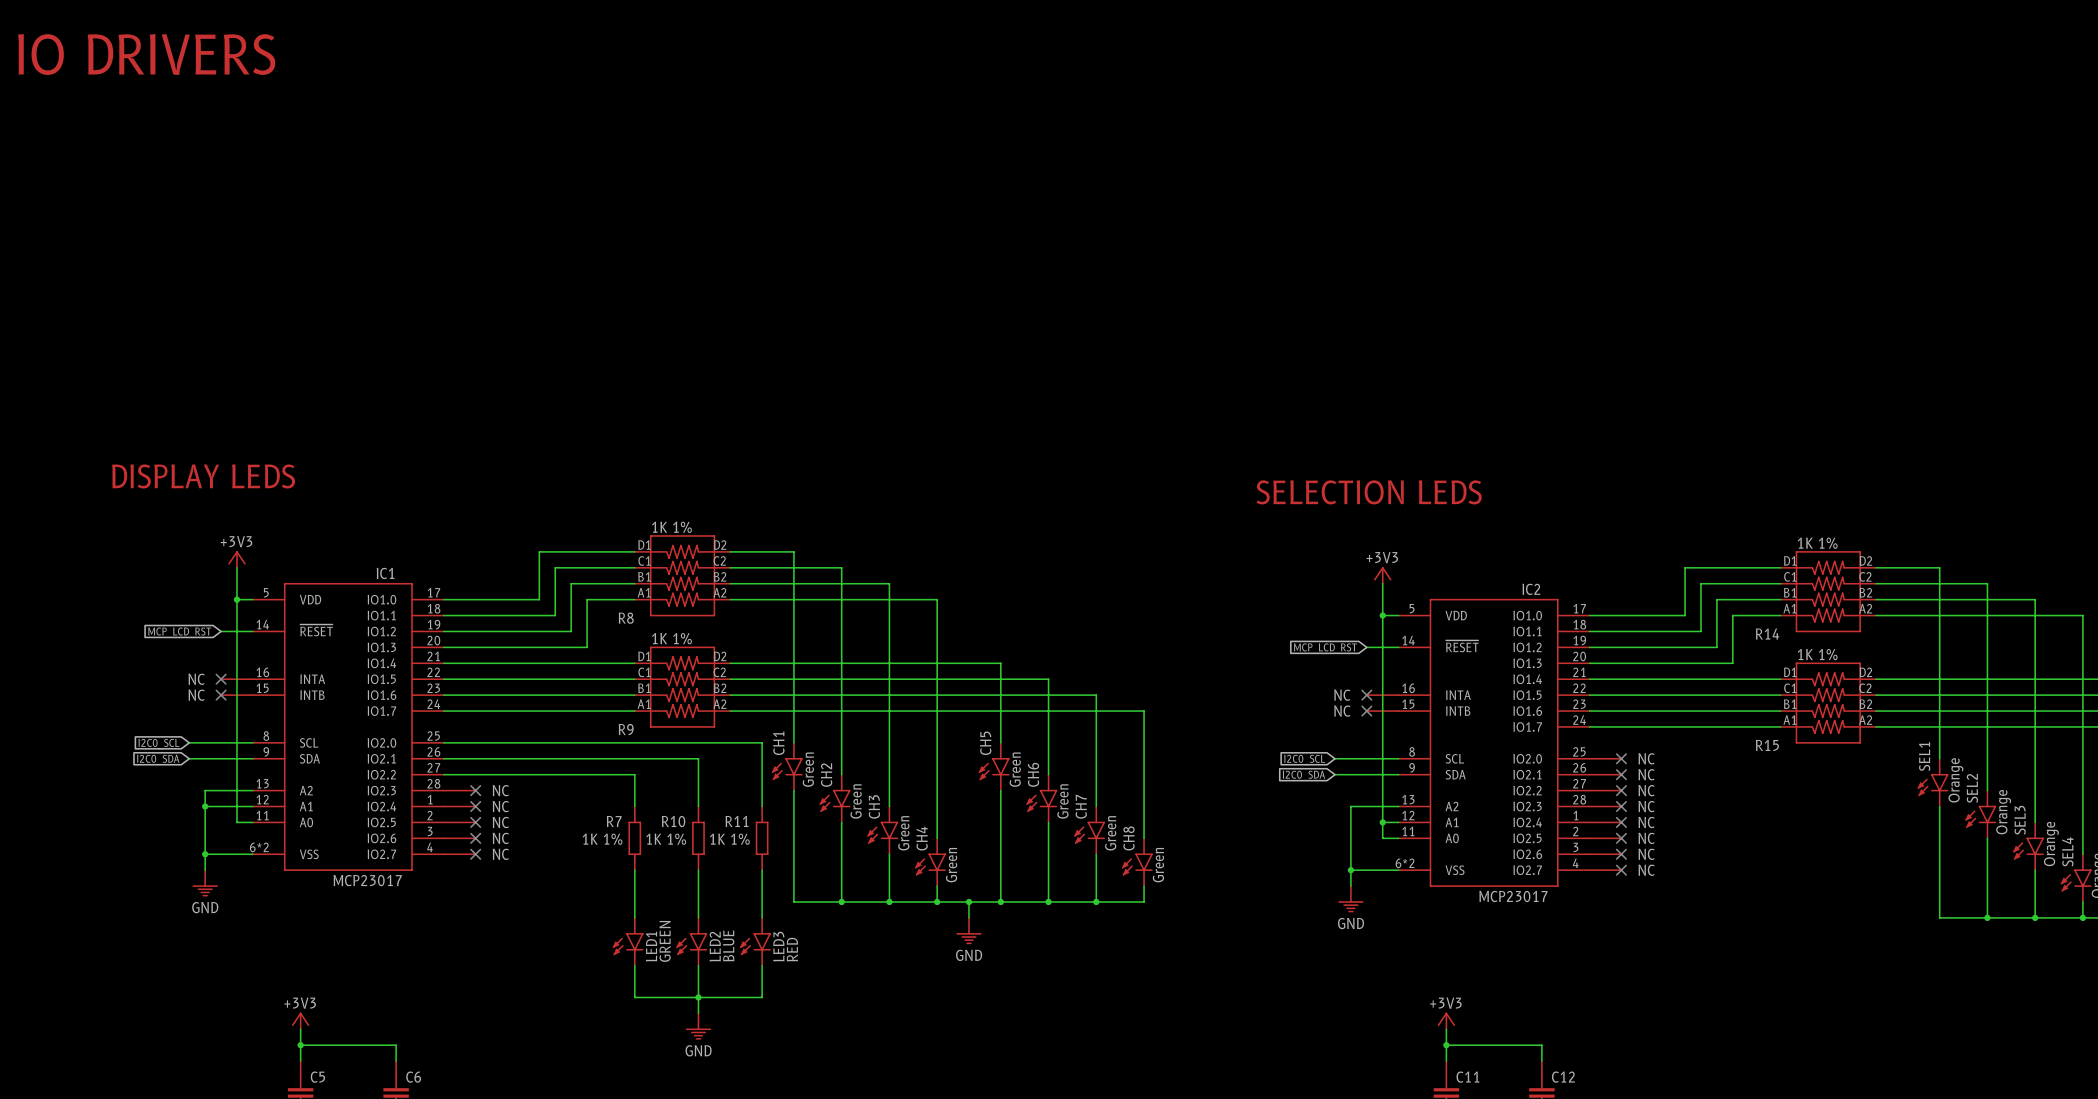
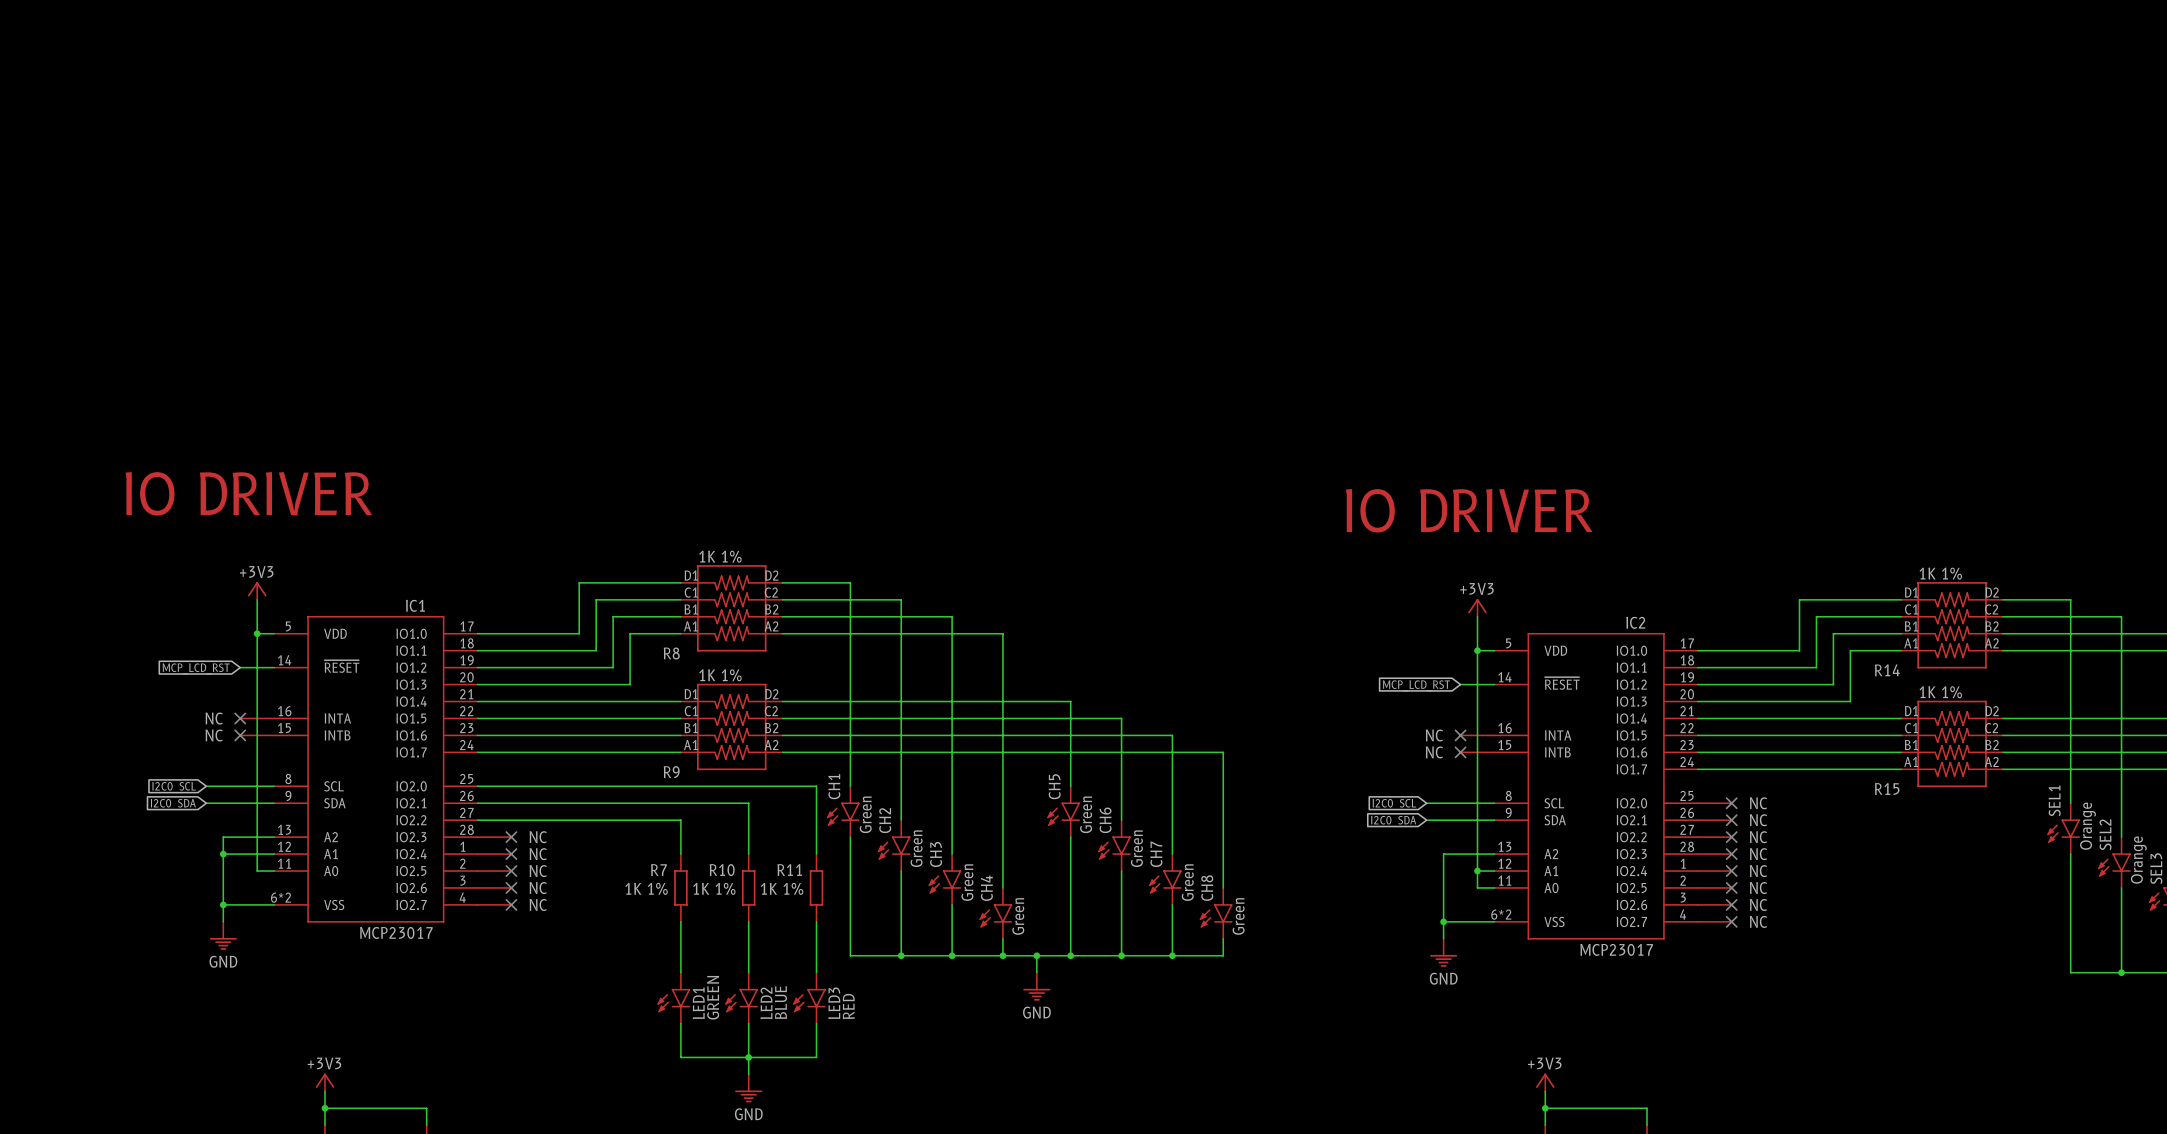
text: IO DRIVERS (146, 54) -> none
text: DISPLAY LEDS (203, 476) -> IO DRIVER (248, 493)
text: SELECTION LEDS (1369, 492) -> IO DRIVER (1469, 510)

